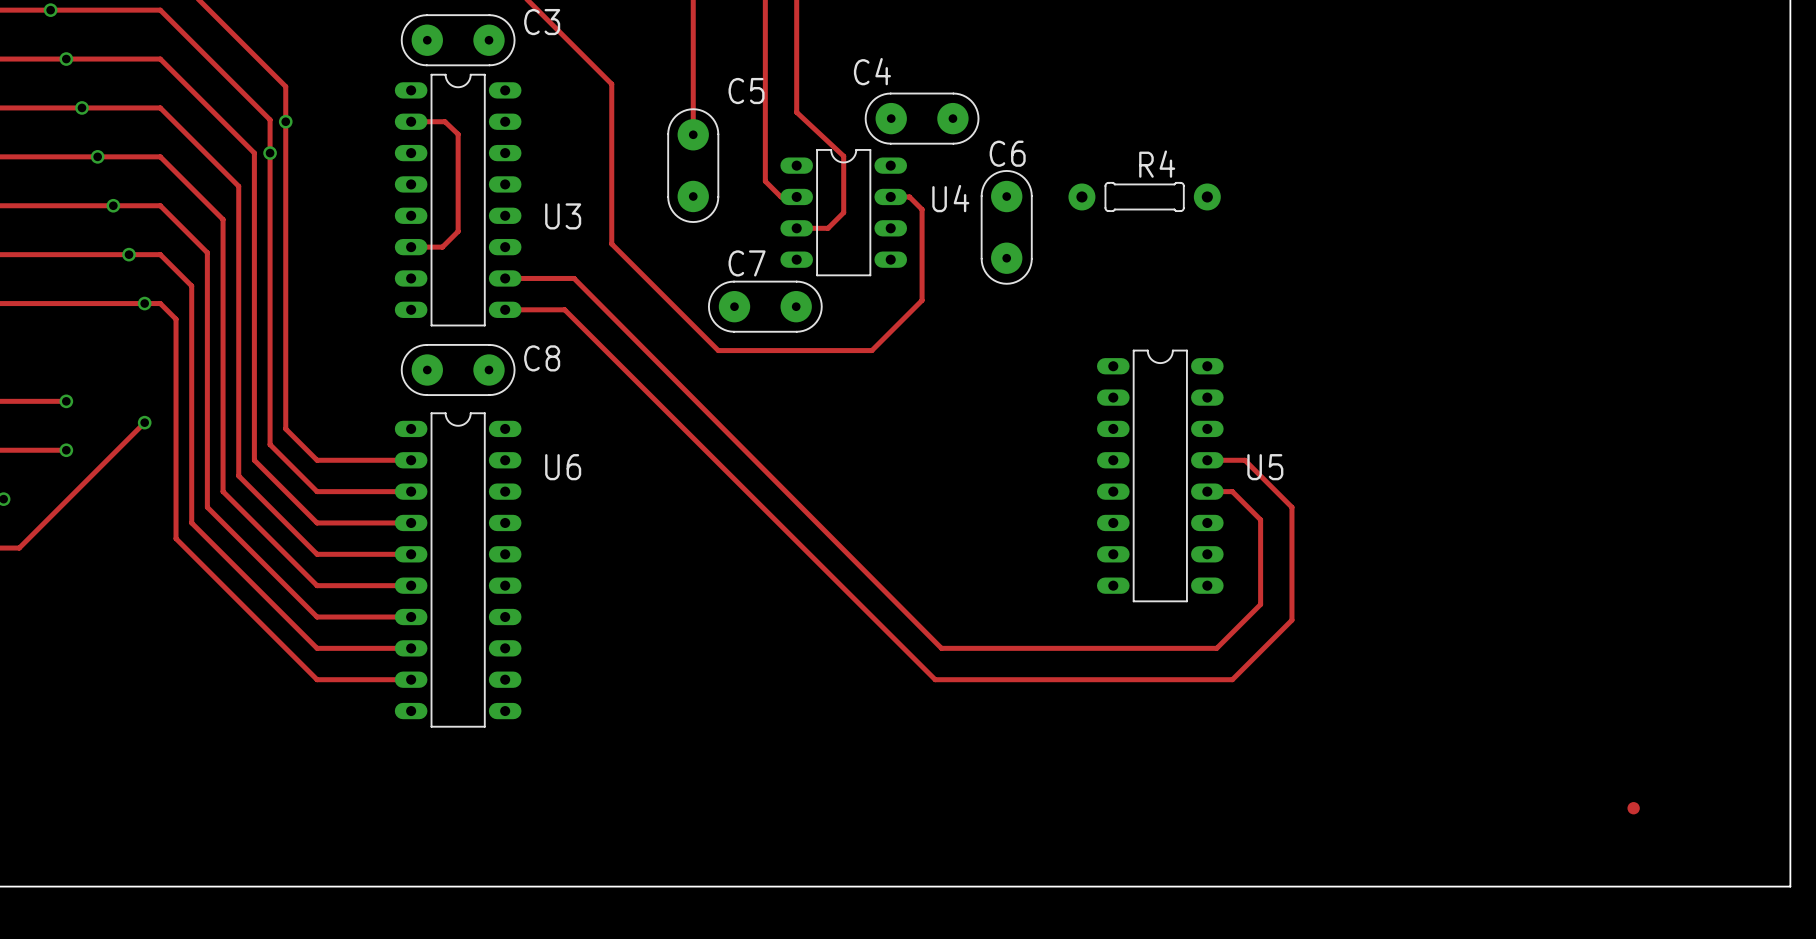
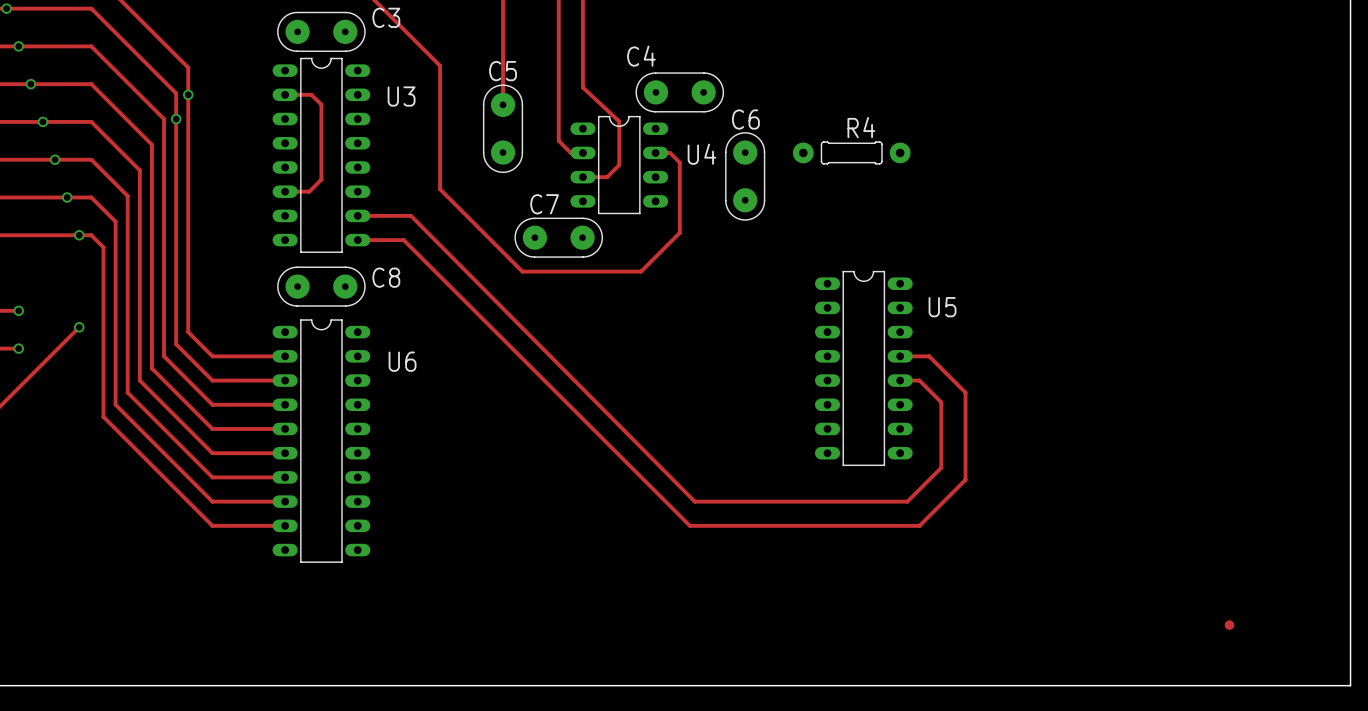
C5 name position: C5 (746, 91) -> C5 (503, 71)
U3 name position: U3 (563, 216) -> U3 (401, 96)
U5 name position: U5 (1265, 467) -> U5 (942, 307)

